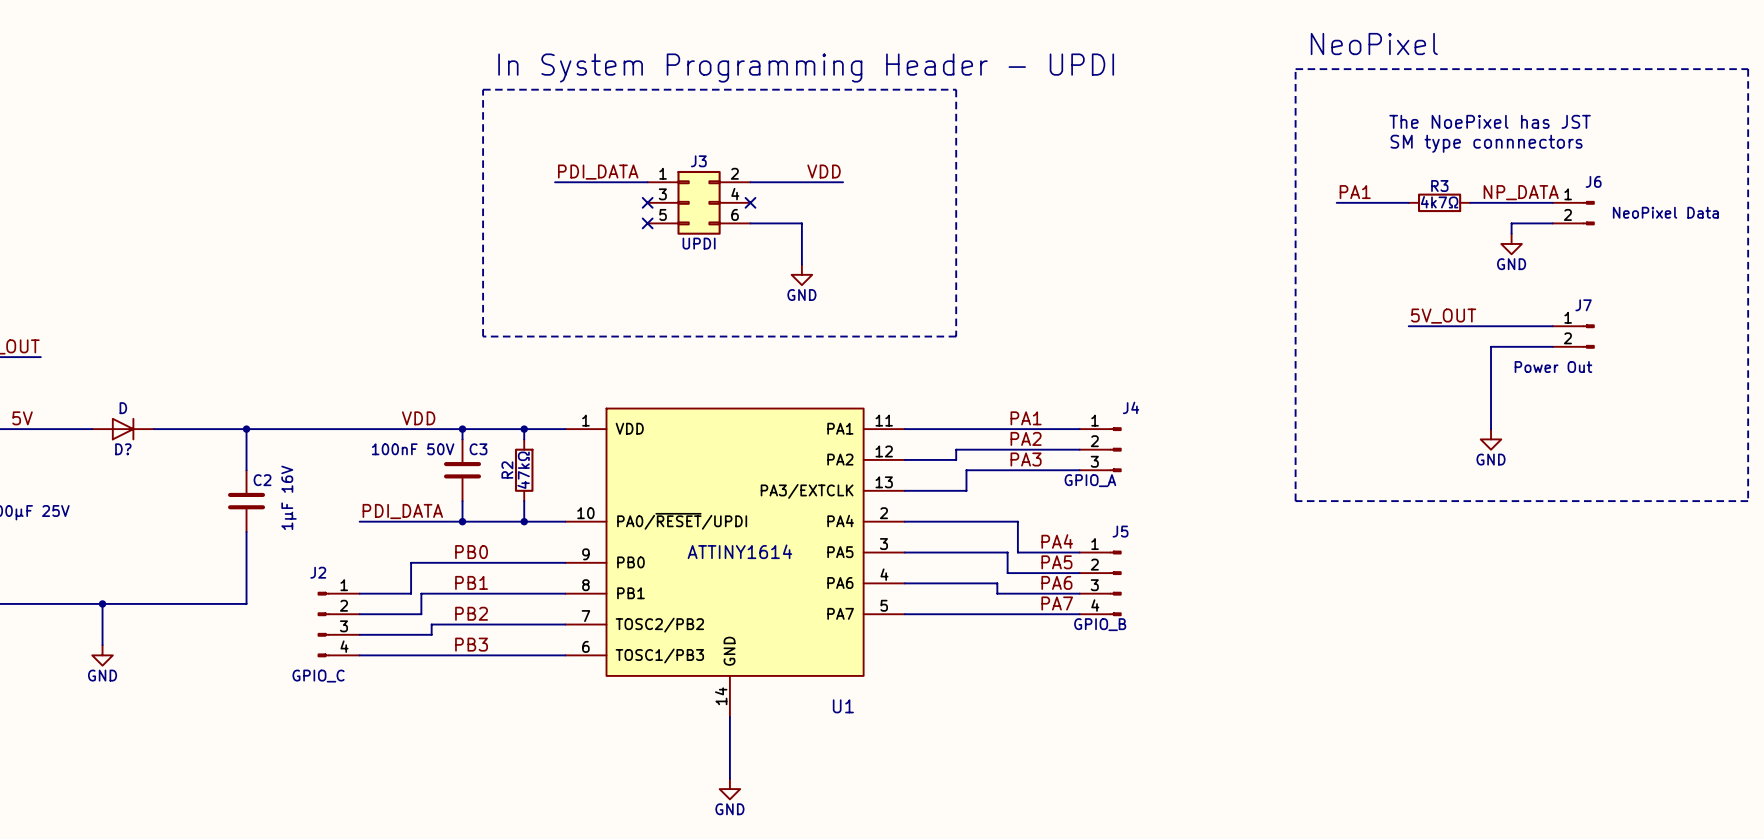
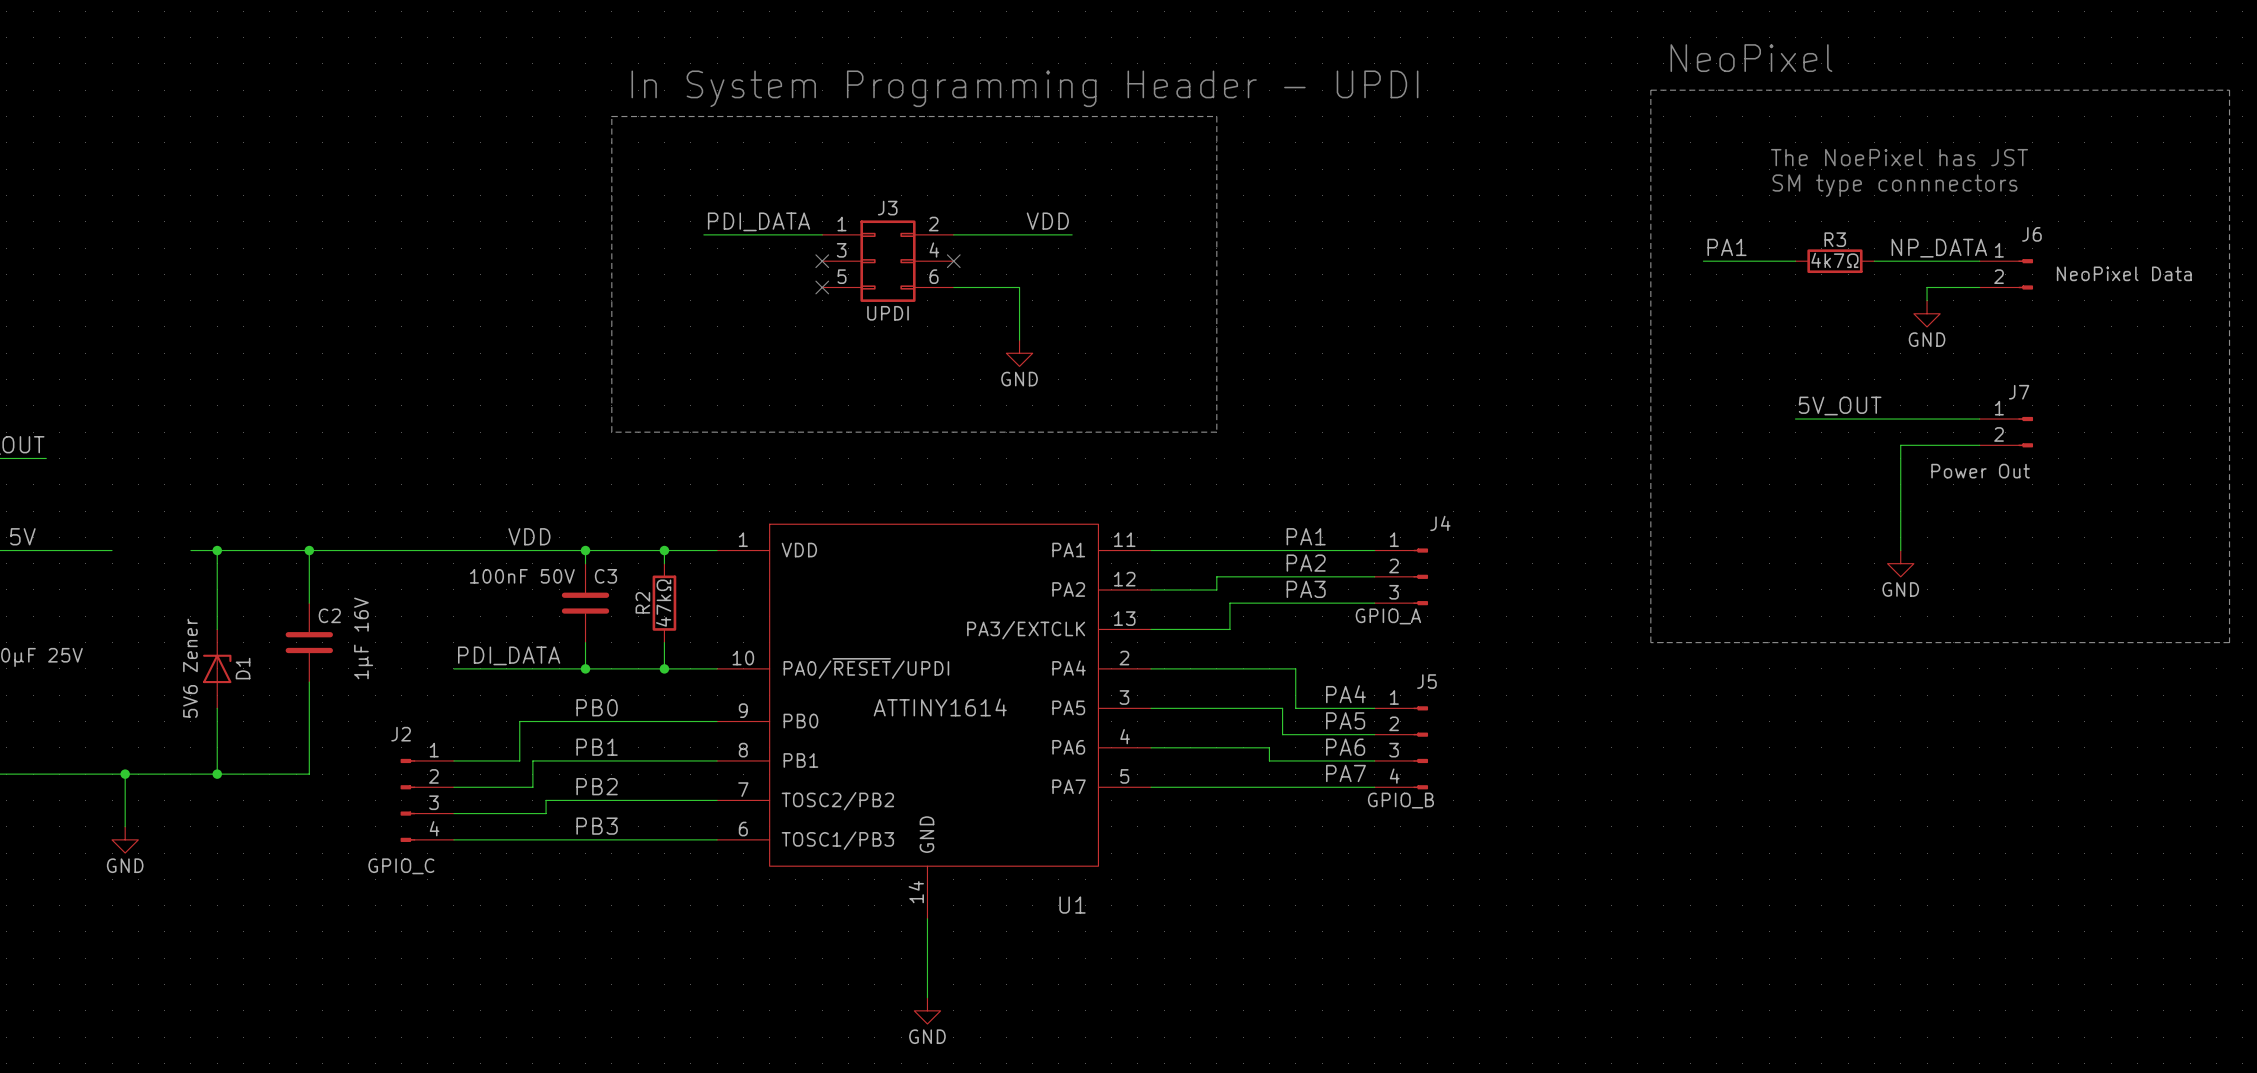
D?: D (123, 429) -> none
wire: none -> (217, 550) (217, 629)
junction: none -> (217, 550)
D1: none -> 5V6 Zener (217, 668)
wire: none -> (217, 708) (217, 774)
junction: none -> (217, 774)

